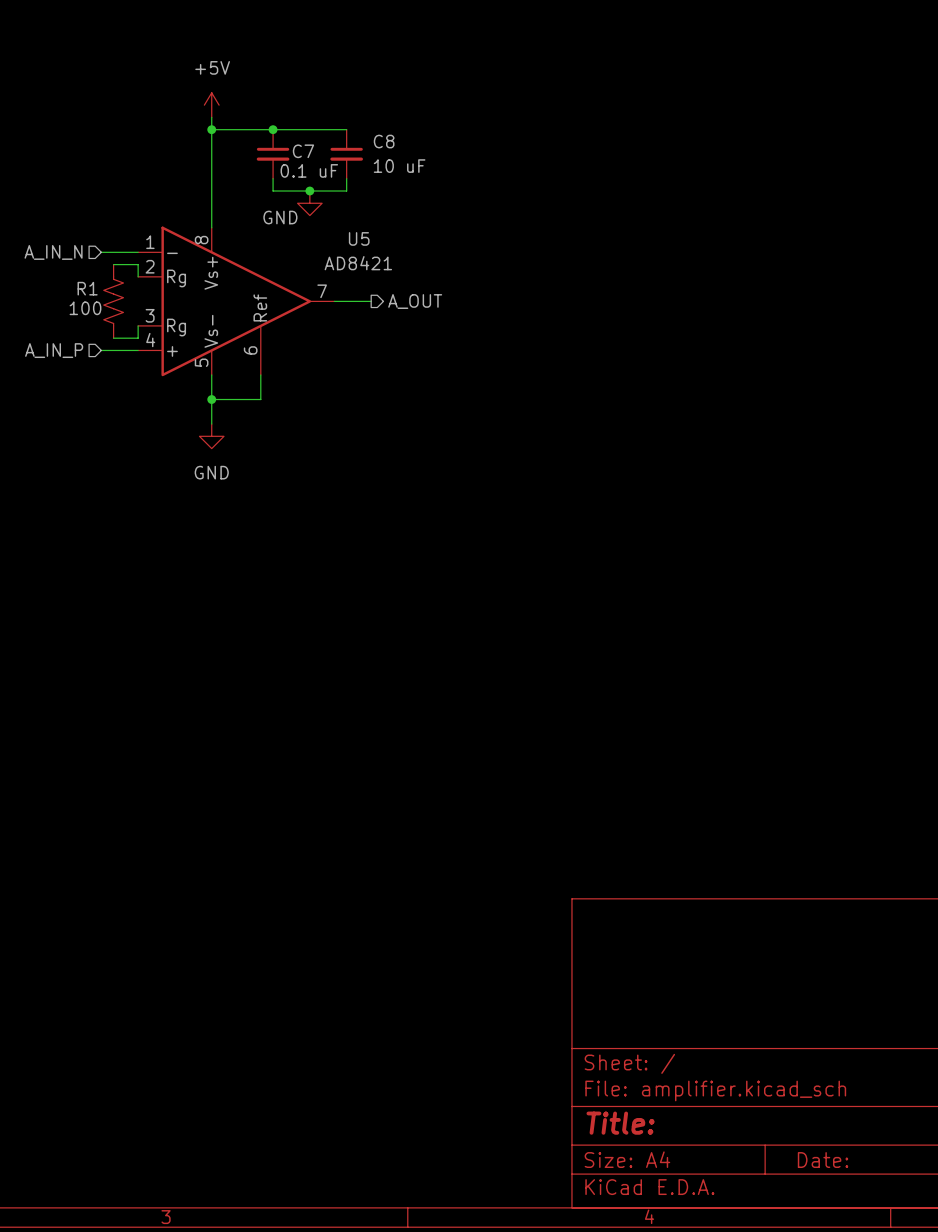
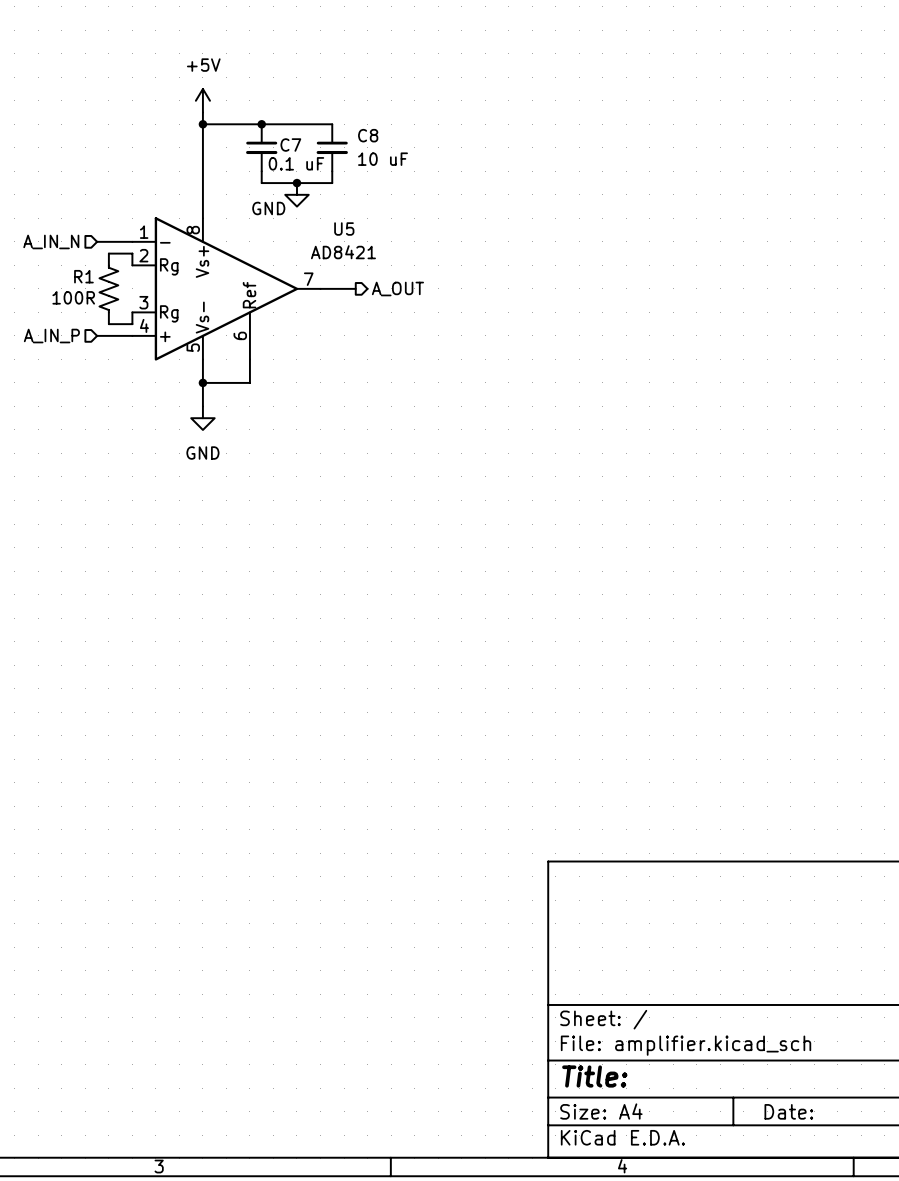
R1 value: 100 (85, 308) -> 100R (73, 297)

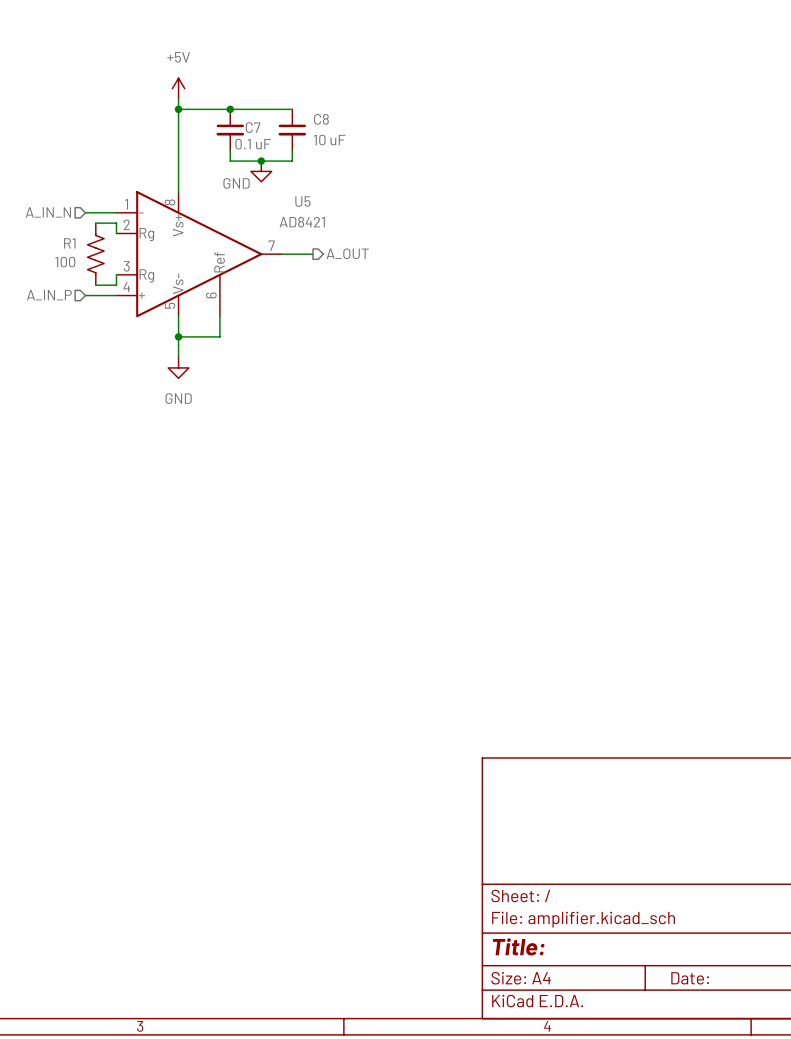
R1 value: 100R (73, 297) -> 100 (65, 262)

